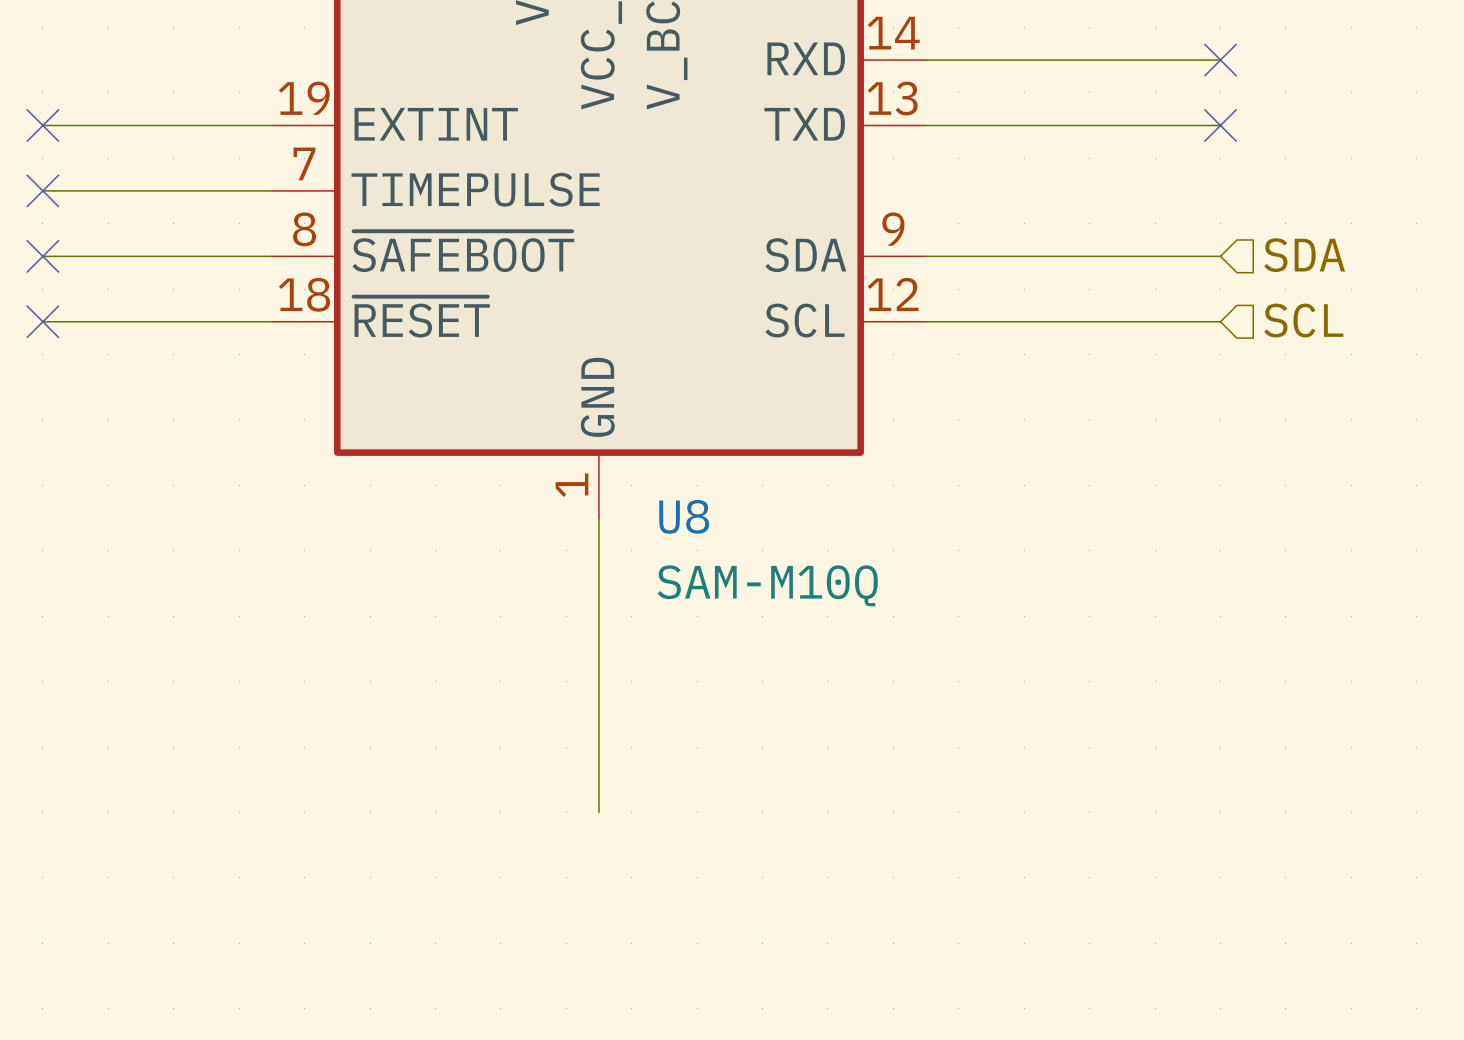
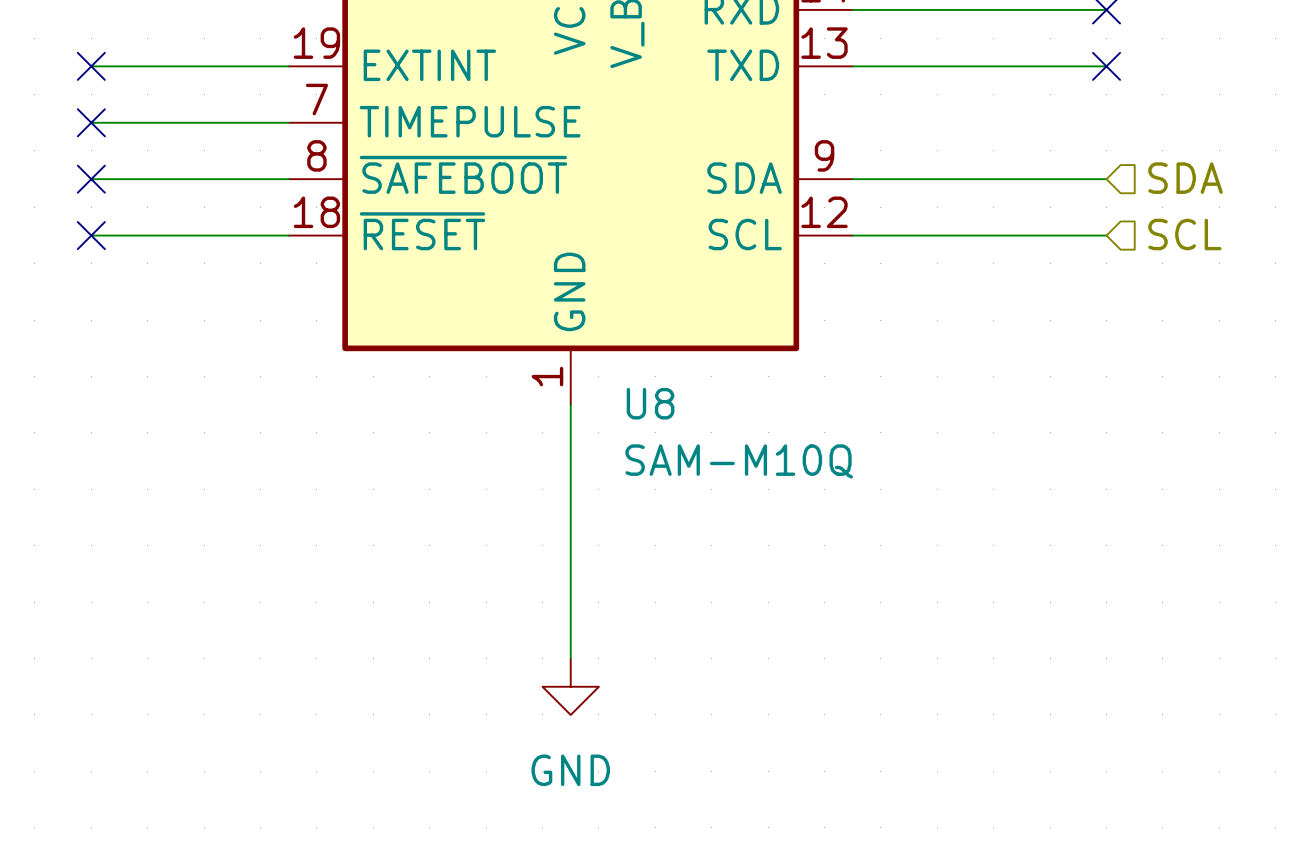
power symbol: none -> GND (570, 686)

